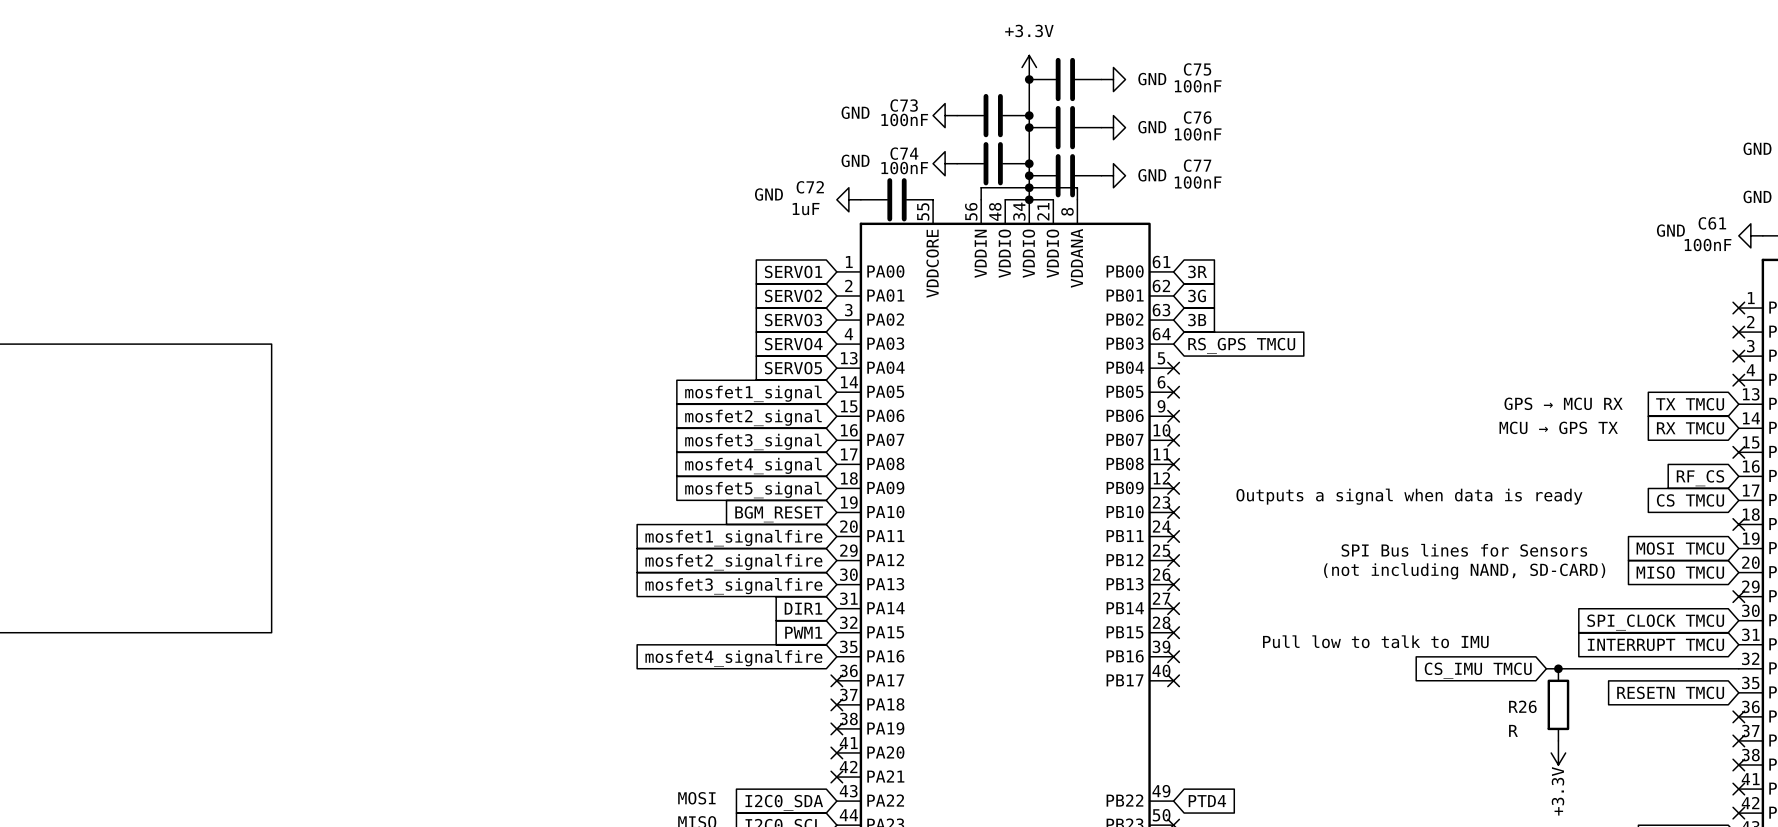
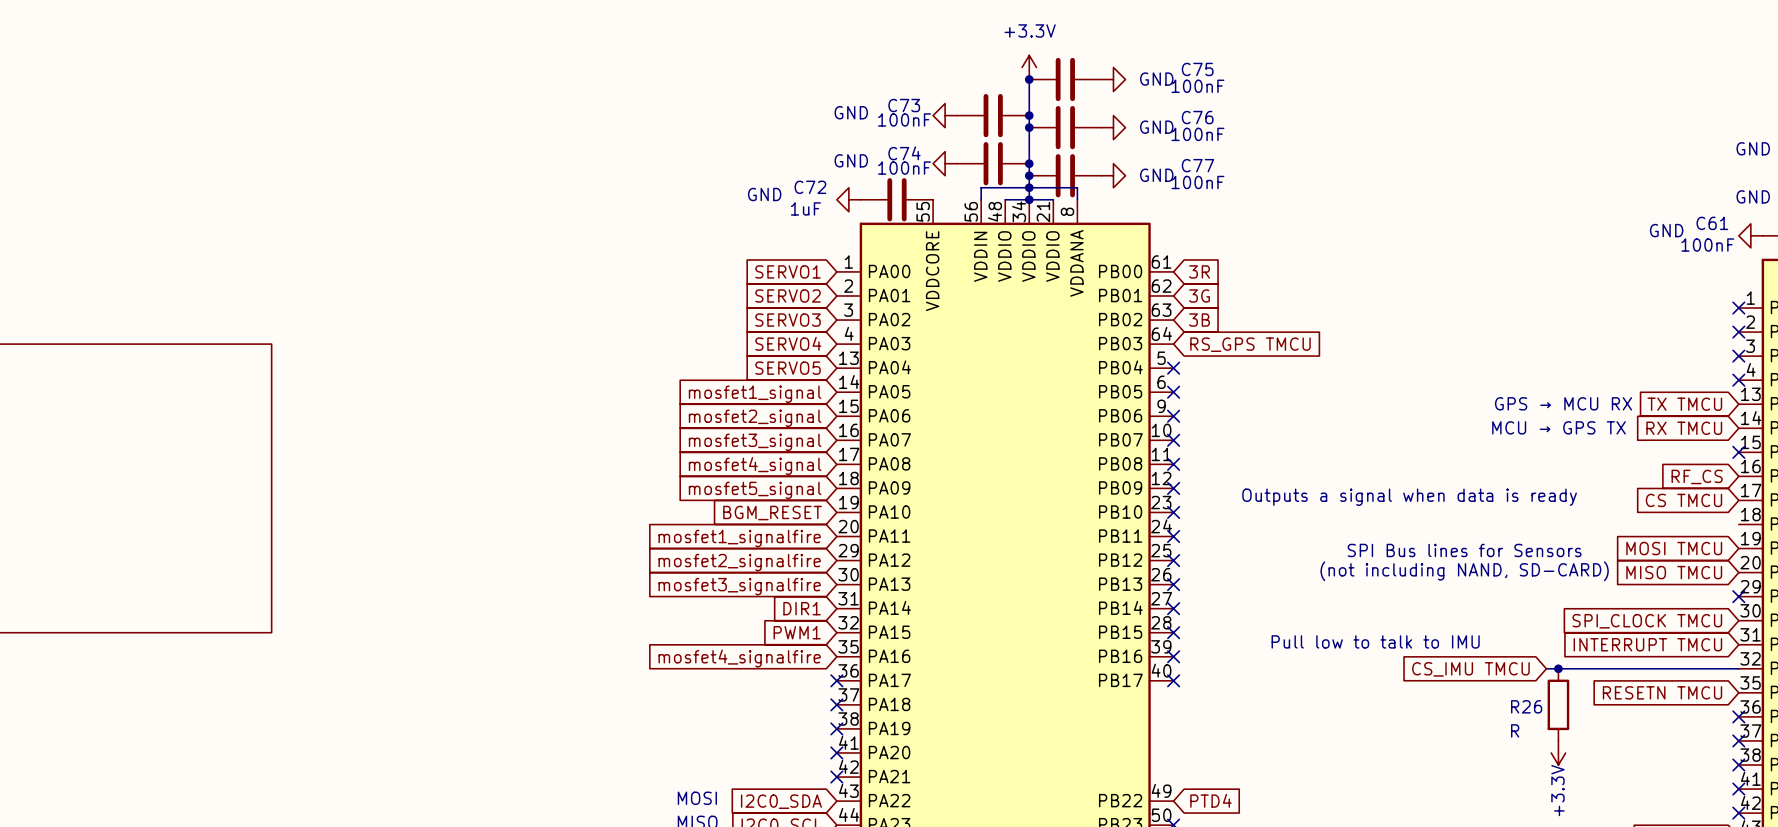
no-connect mark: (1738, 524) -> none

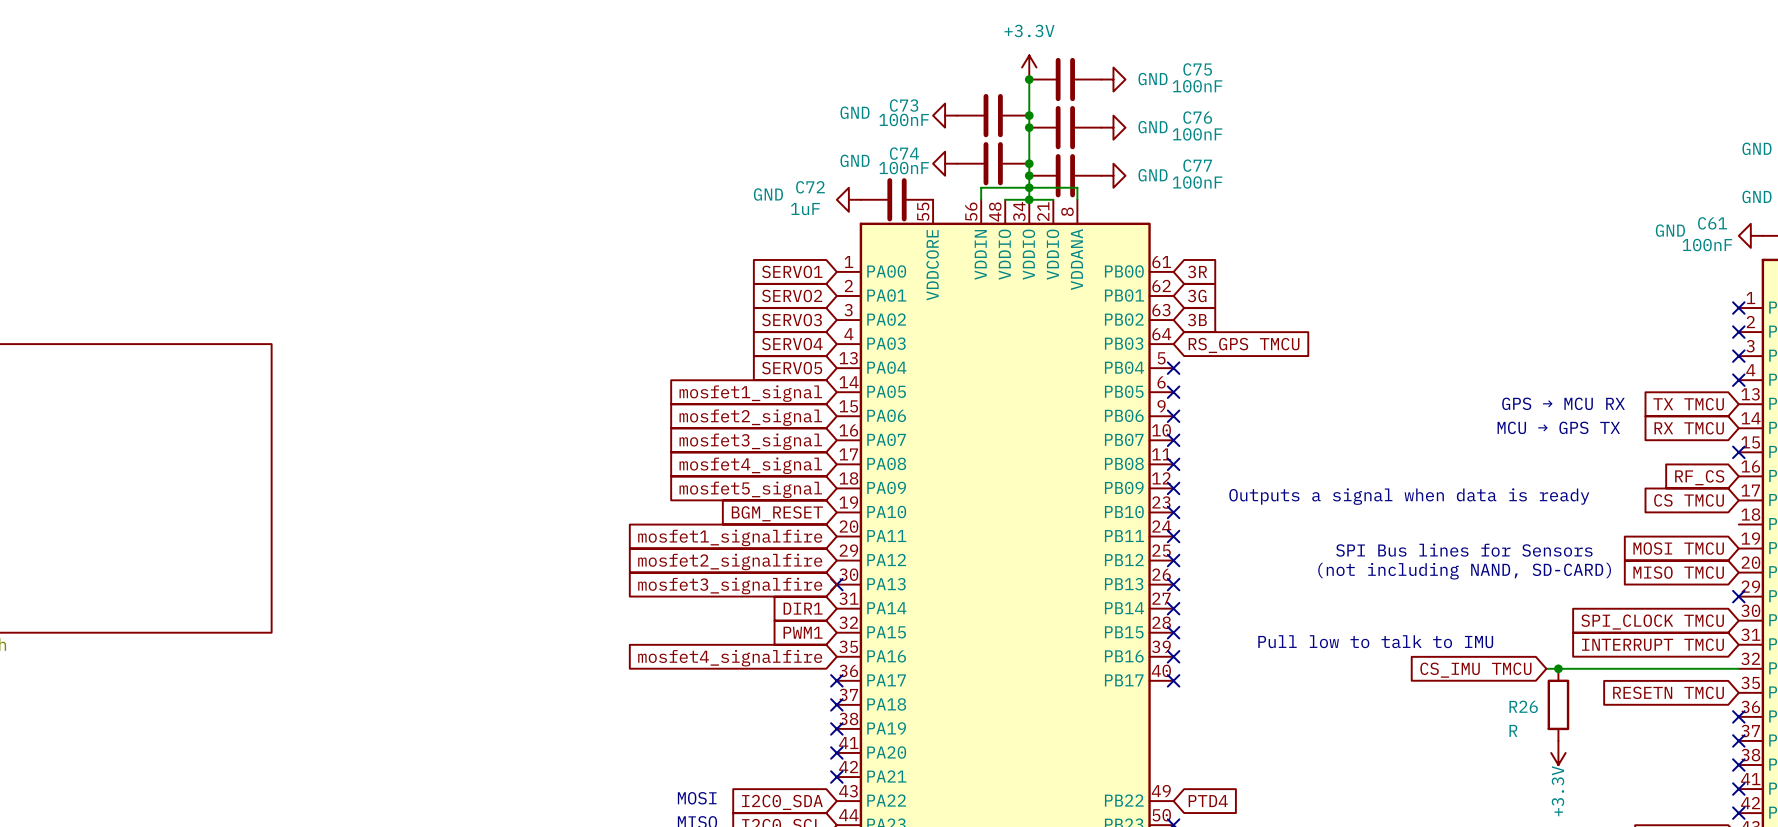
no-connect mark: none -> (836, 584)

